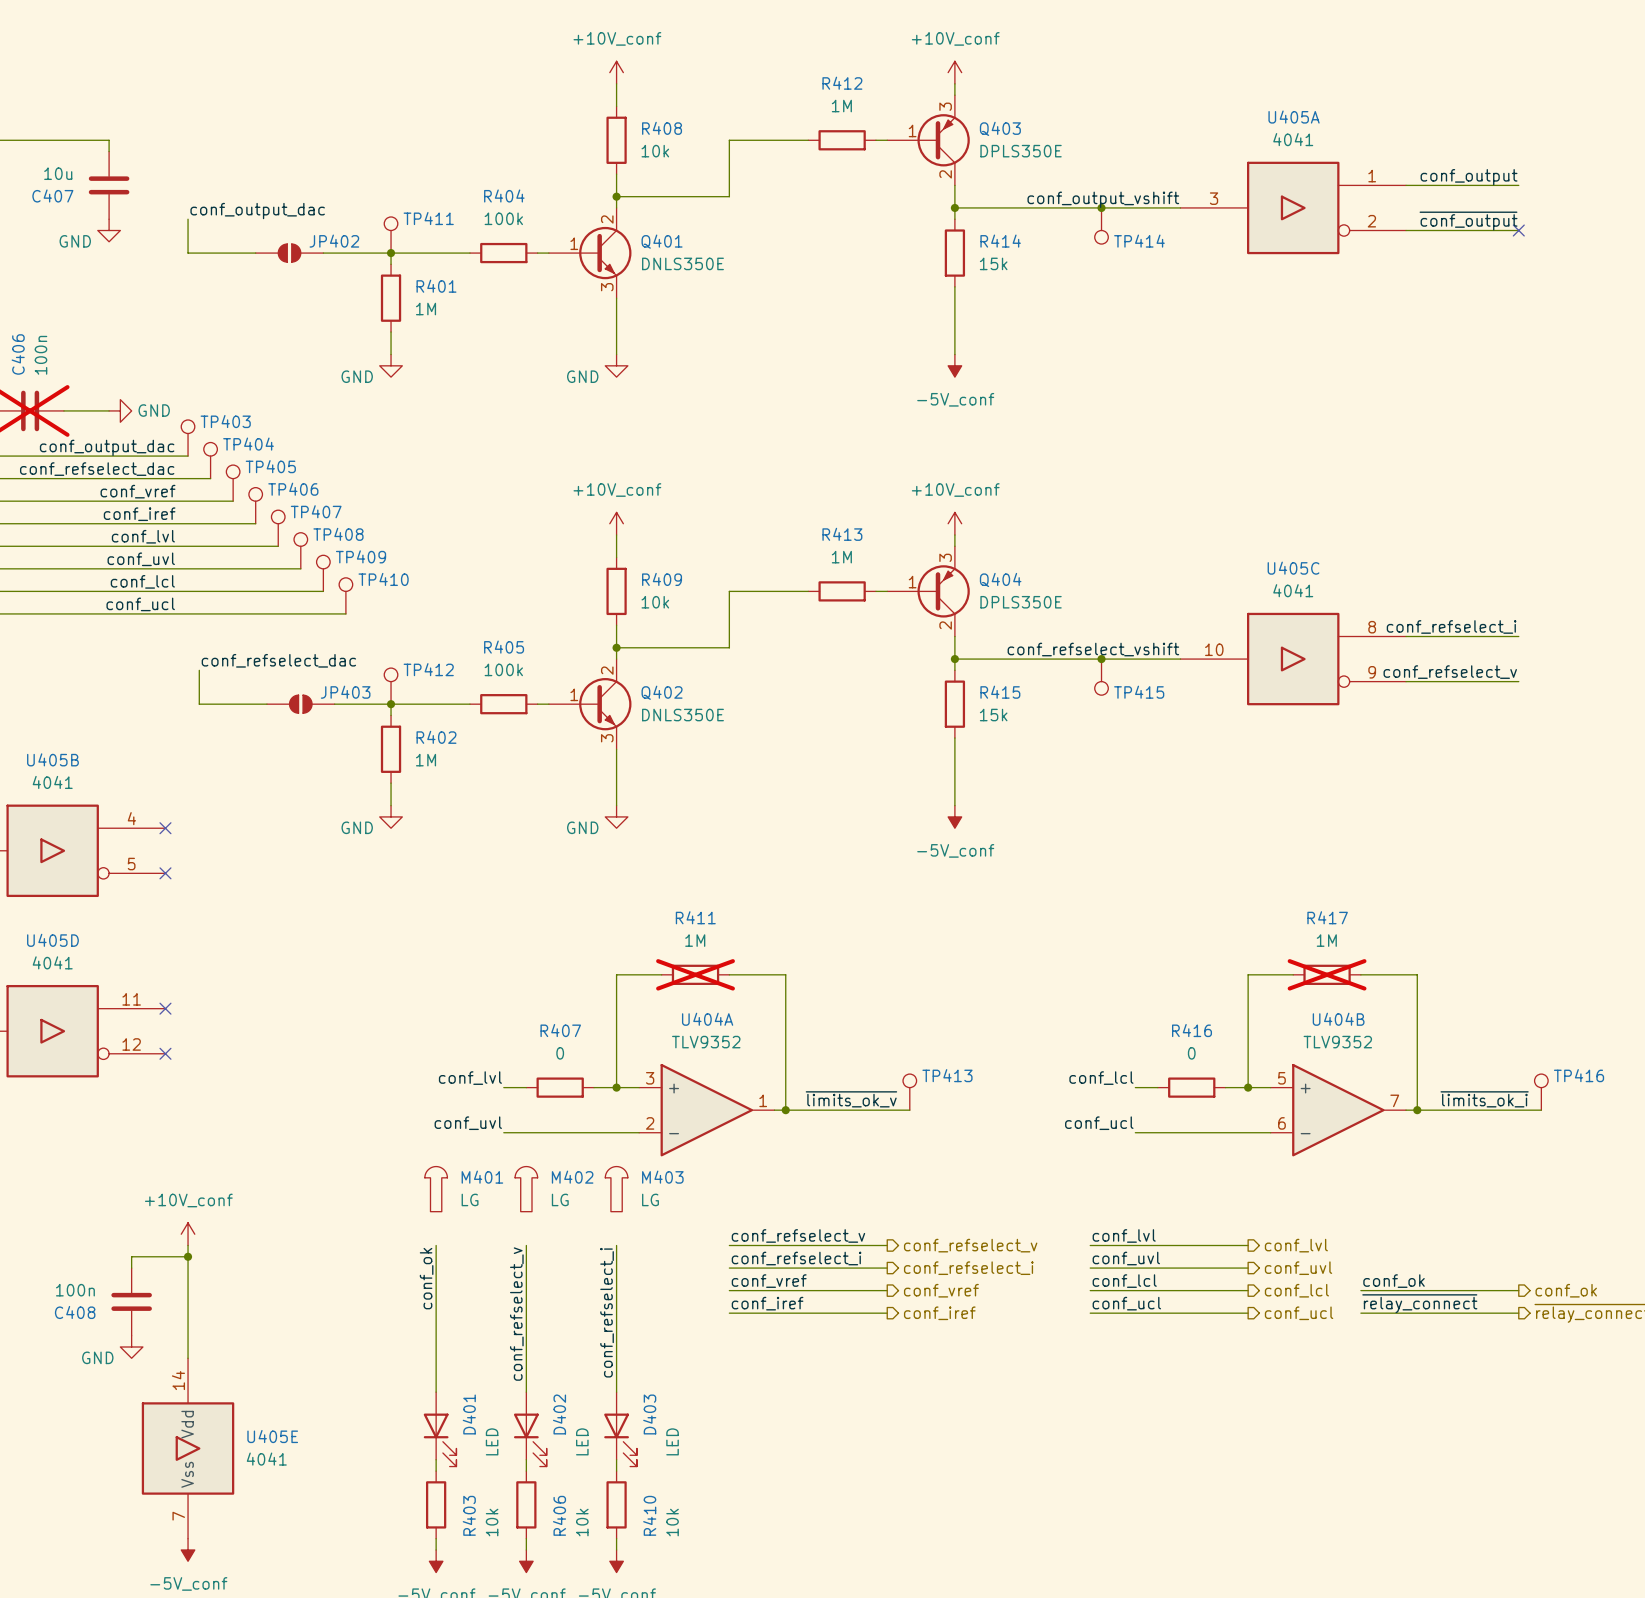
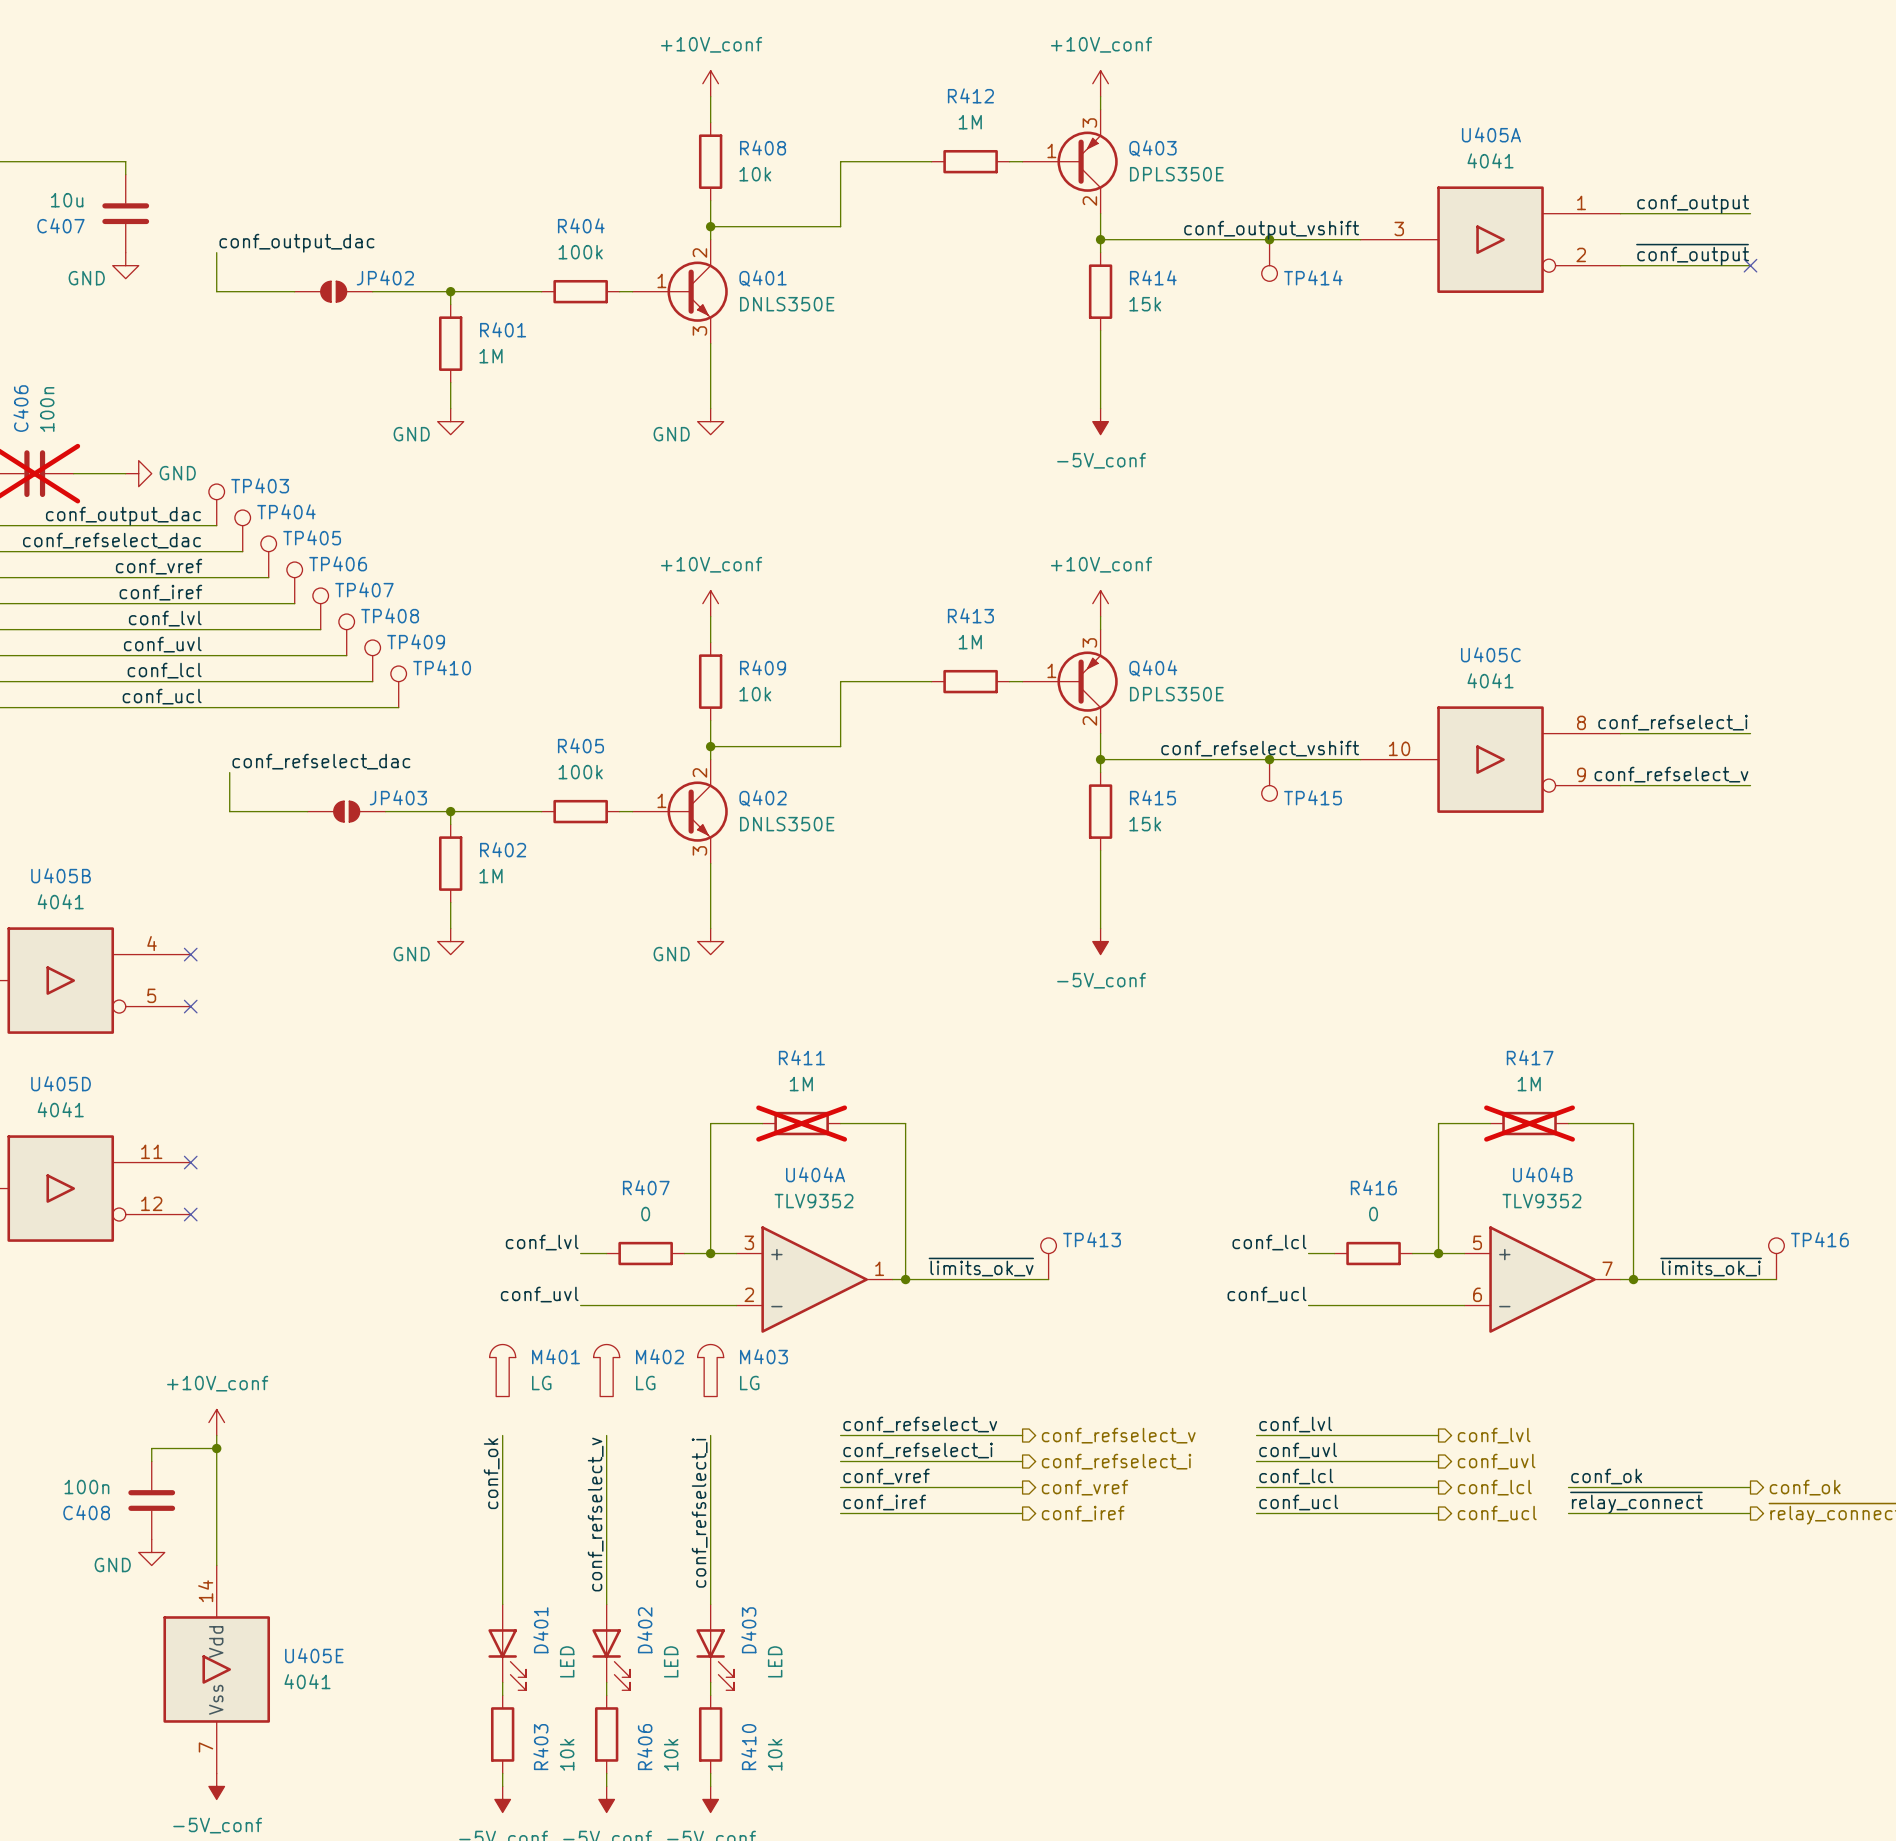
TP411: (391, 235) -> none
TP412: (391, 686) -> none

